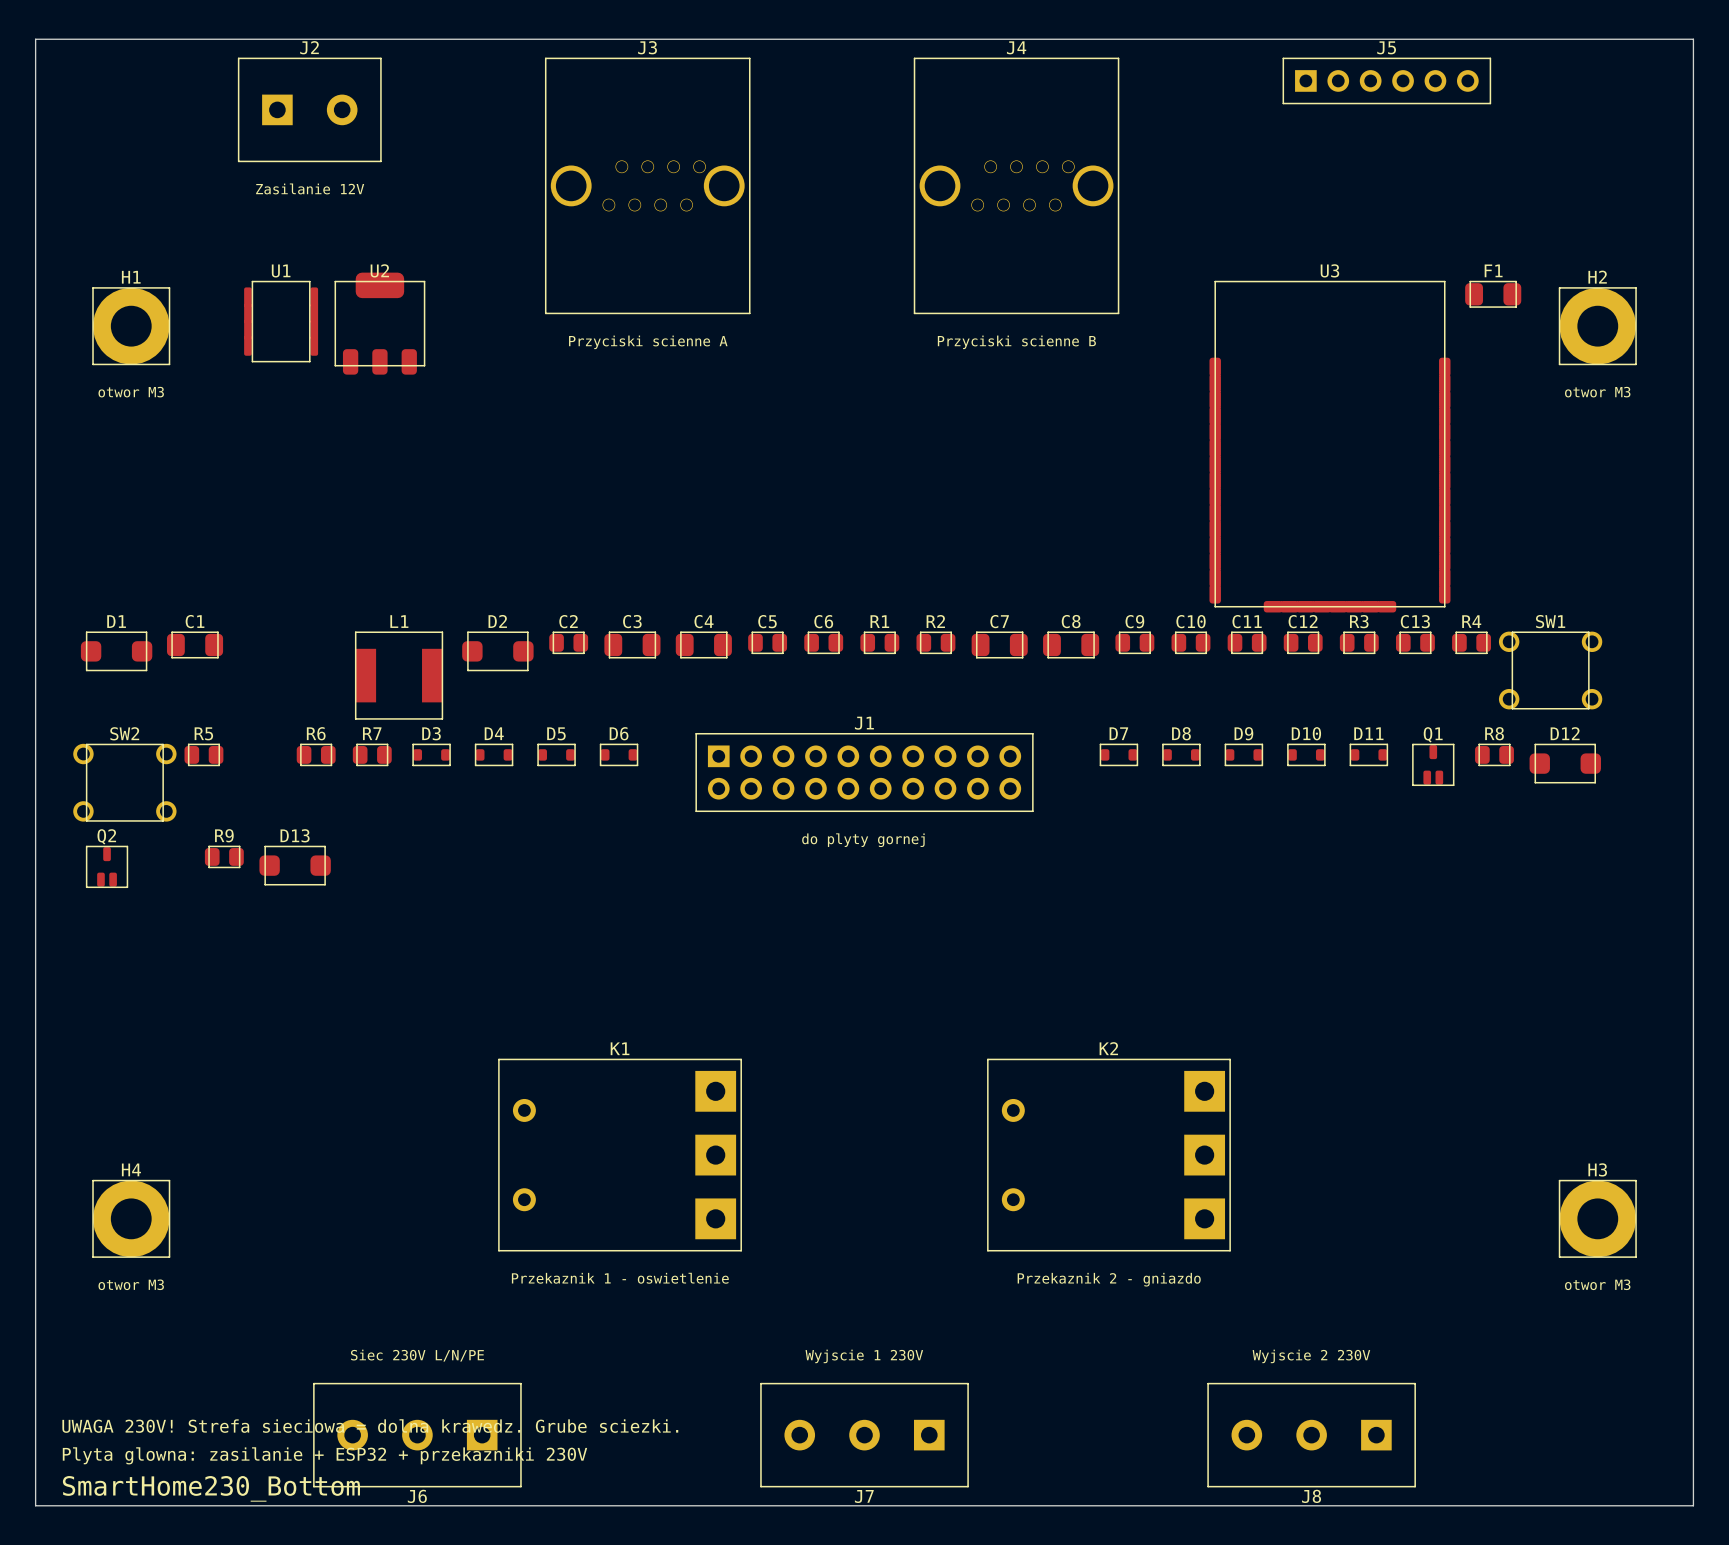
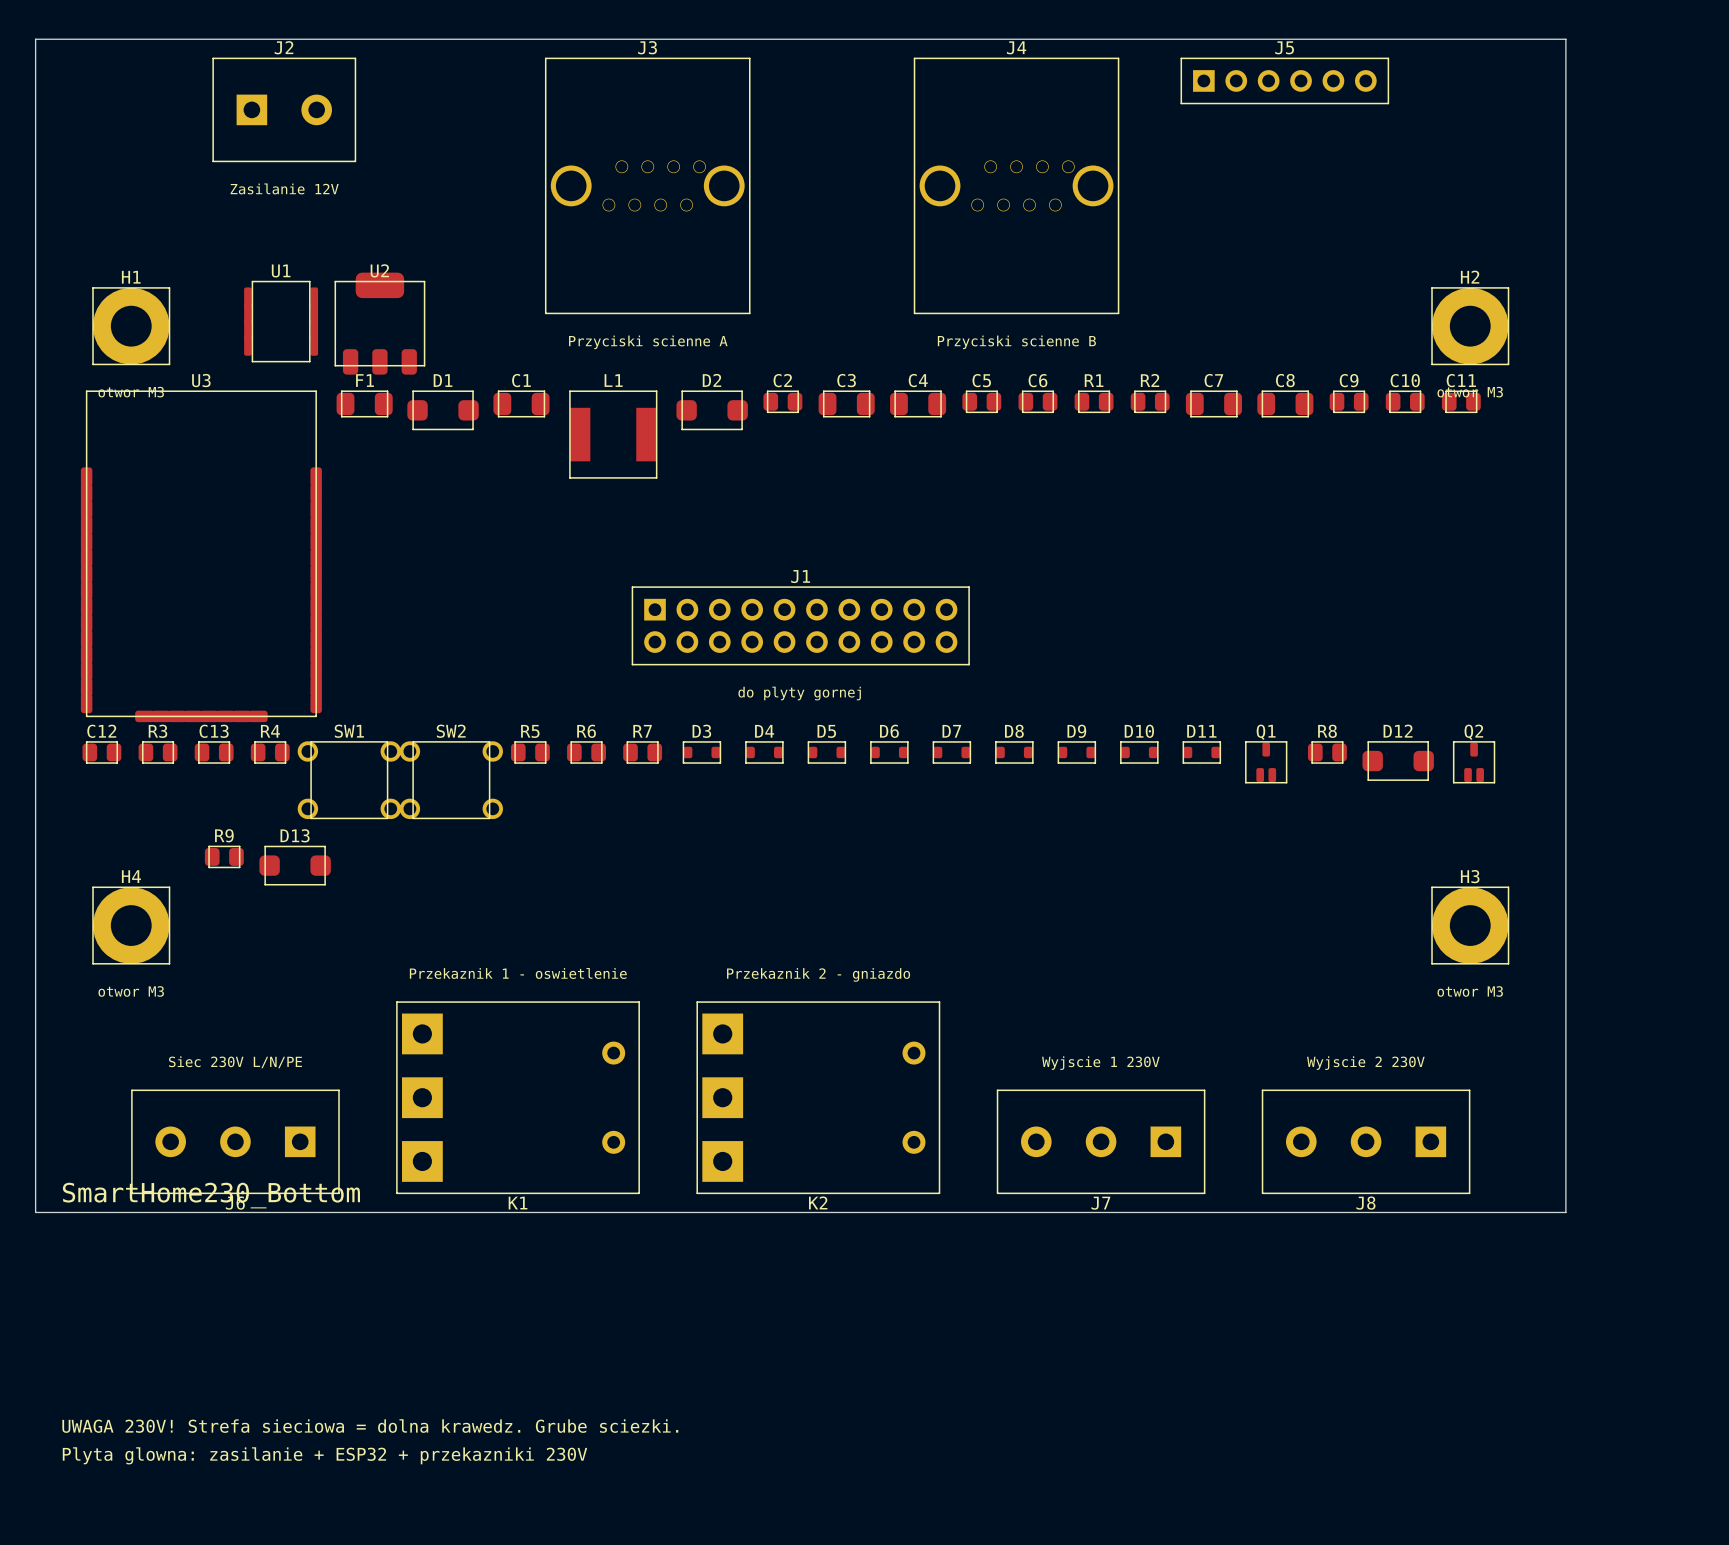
board edge: (1565, 39) (1693, 39) (1693, 1505) (35, 1505) (35, 1212) -> (1565, 39) (1565, 1212) (35, 1212)
J5 position: (1386, 80) -> (1284, 80)
J2 position: (309, 109) -> (284, 109)
F1 position: (1493, 294) -> (364, 403)
H2 position: (1597, 326) -> (1470, 326)
U3 position: (1329, 446) -> (201, 556)
C2 position: (568, 642) -> (782, 401)
C5 position: (767, 642) -> (981, 401)
C6 position: (823, 642) -> (1037, 401)
R1 position: (879, 642) -> (1094, 401)
R2 position: (935, 642) -> (1150, 401)
C9 position: (1134, 642) -> (1349, 401)
C10 position: (1190, 642) -> (1405, 401)
C11 position: (1247, 642) -> (1461, 401)
C12 position: (1303, 642) -> (101, 752)
R3 position: (1359, 642) -> (158, 752)
C13 position: (1415, 642) -> (214, 752)
R4 position: (1471, 642) -> (270, 752)
C1 position: (195, 644) -> (521, 403)
C3 position: (632, 644) -> (846, 403)
C4 position: (703, 644) -> (918, 403)
C7 position: (999, 644) -> (1213, 403)
C8 position: (1071, 644) -> (1285, 403)
D1 position: (116, 651) -> (443, 410)
D2 position: (497, 651) -> (712, 410)
SW1 position: (1550, 670) -> (349, 780)
L1 position: (399, 675) -> (613, 434)
R5 position: (203, 754) -> (530, 752)
R6 position: (316, 754) -> (586, 752)
R7 position: (372, 754) -> (642, 752)
D3 position: (431, 754) -> (701, 752)
D4 position: (494, 754) -> (764, 752)
D5 position: (556, 754) -> (826, 752)
D6 position: (619, 754) -> (889, 752)
D7 position: (1118, 754) -> (951, 752)
D8 position: (1181, 754) -> (1014, 752)
D9 position: (1243, 754) -> (1076, 752)
D10 position: (1306, 754) -> (1139, 752)
D11 position: (1368, 754) -> (1201, 752)
R8 position: (1494, 754) -> (1327, 752)
D12 position: (1565, 763) -> (1398, 761)
Q1 position: (1433, 764) -> (1266, 762)
J1 position: (864, 772) -> (800, 625)
SW2 position: (124, 782) -> (451, 780)
Q2 position: (107, 866) -> (1474, 762)
K1 rotation: 0° (620, 1155) -> 180° (518, 1097)
K2 rotation: 0° (1108, 1155) -> 180° (818, 1097)
K2 position: (1108, 1155) -> (818, 1097)
H4 position: (131, 1218) -> (131, 925)
H3 position: (1597, 1218) -> (1470, 925)
J6 position: (417, 1435) -> (235, 1141)
J7 position: (864, 1435) -> (1101, 1141)
J8 position: (1311, 1435) -> (1366, 1141)
text position: SmartHome230_Bottom (211, 1488) -> SmartHome230_Bottom (211, 1195)

